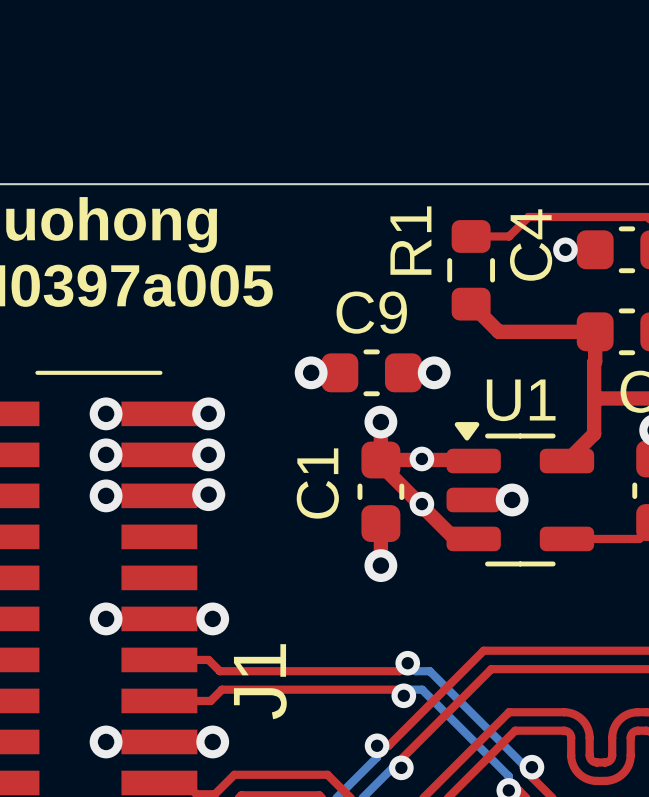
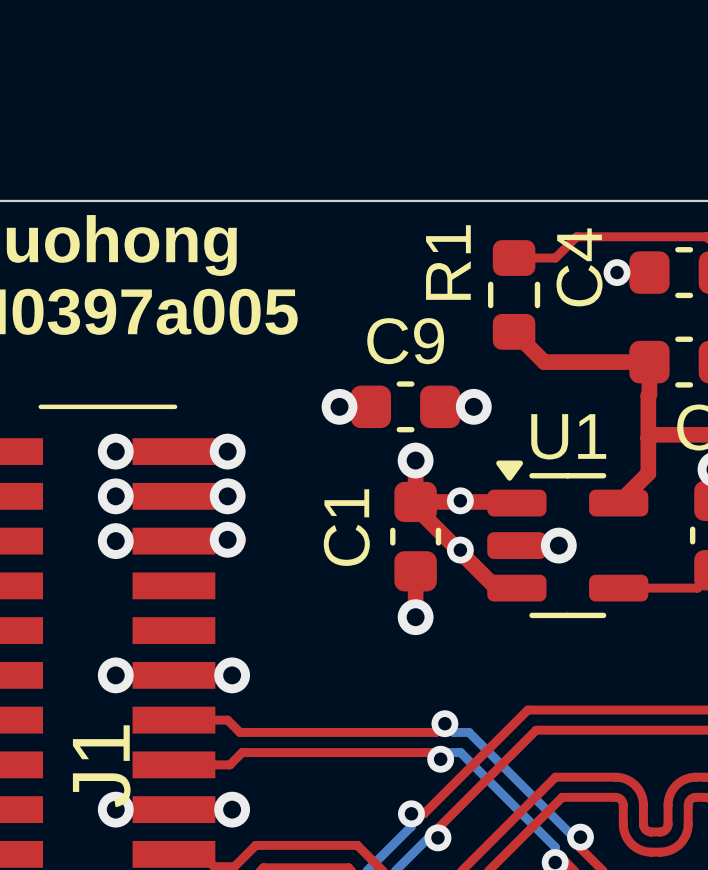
J1 name position: J1 (260, 681) -> J1 (101, 766)

